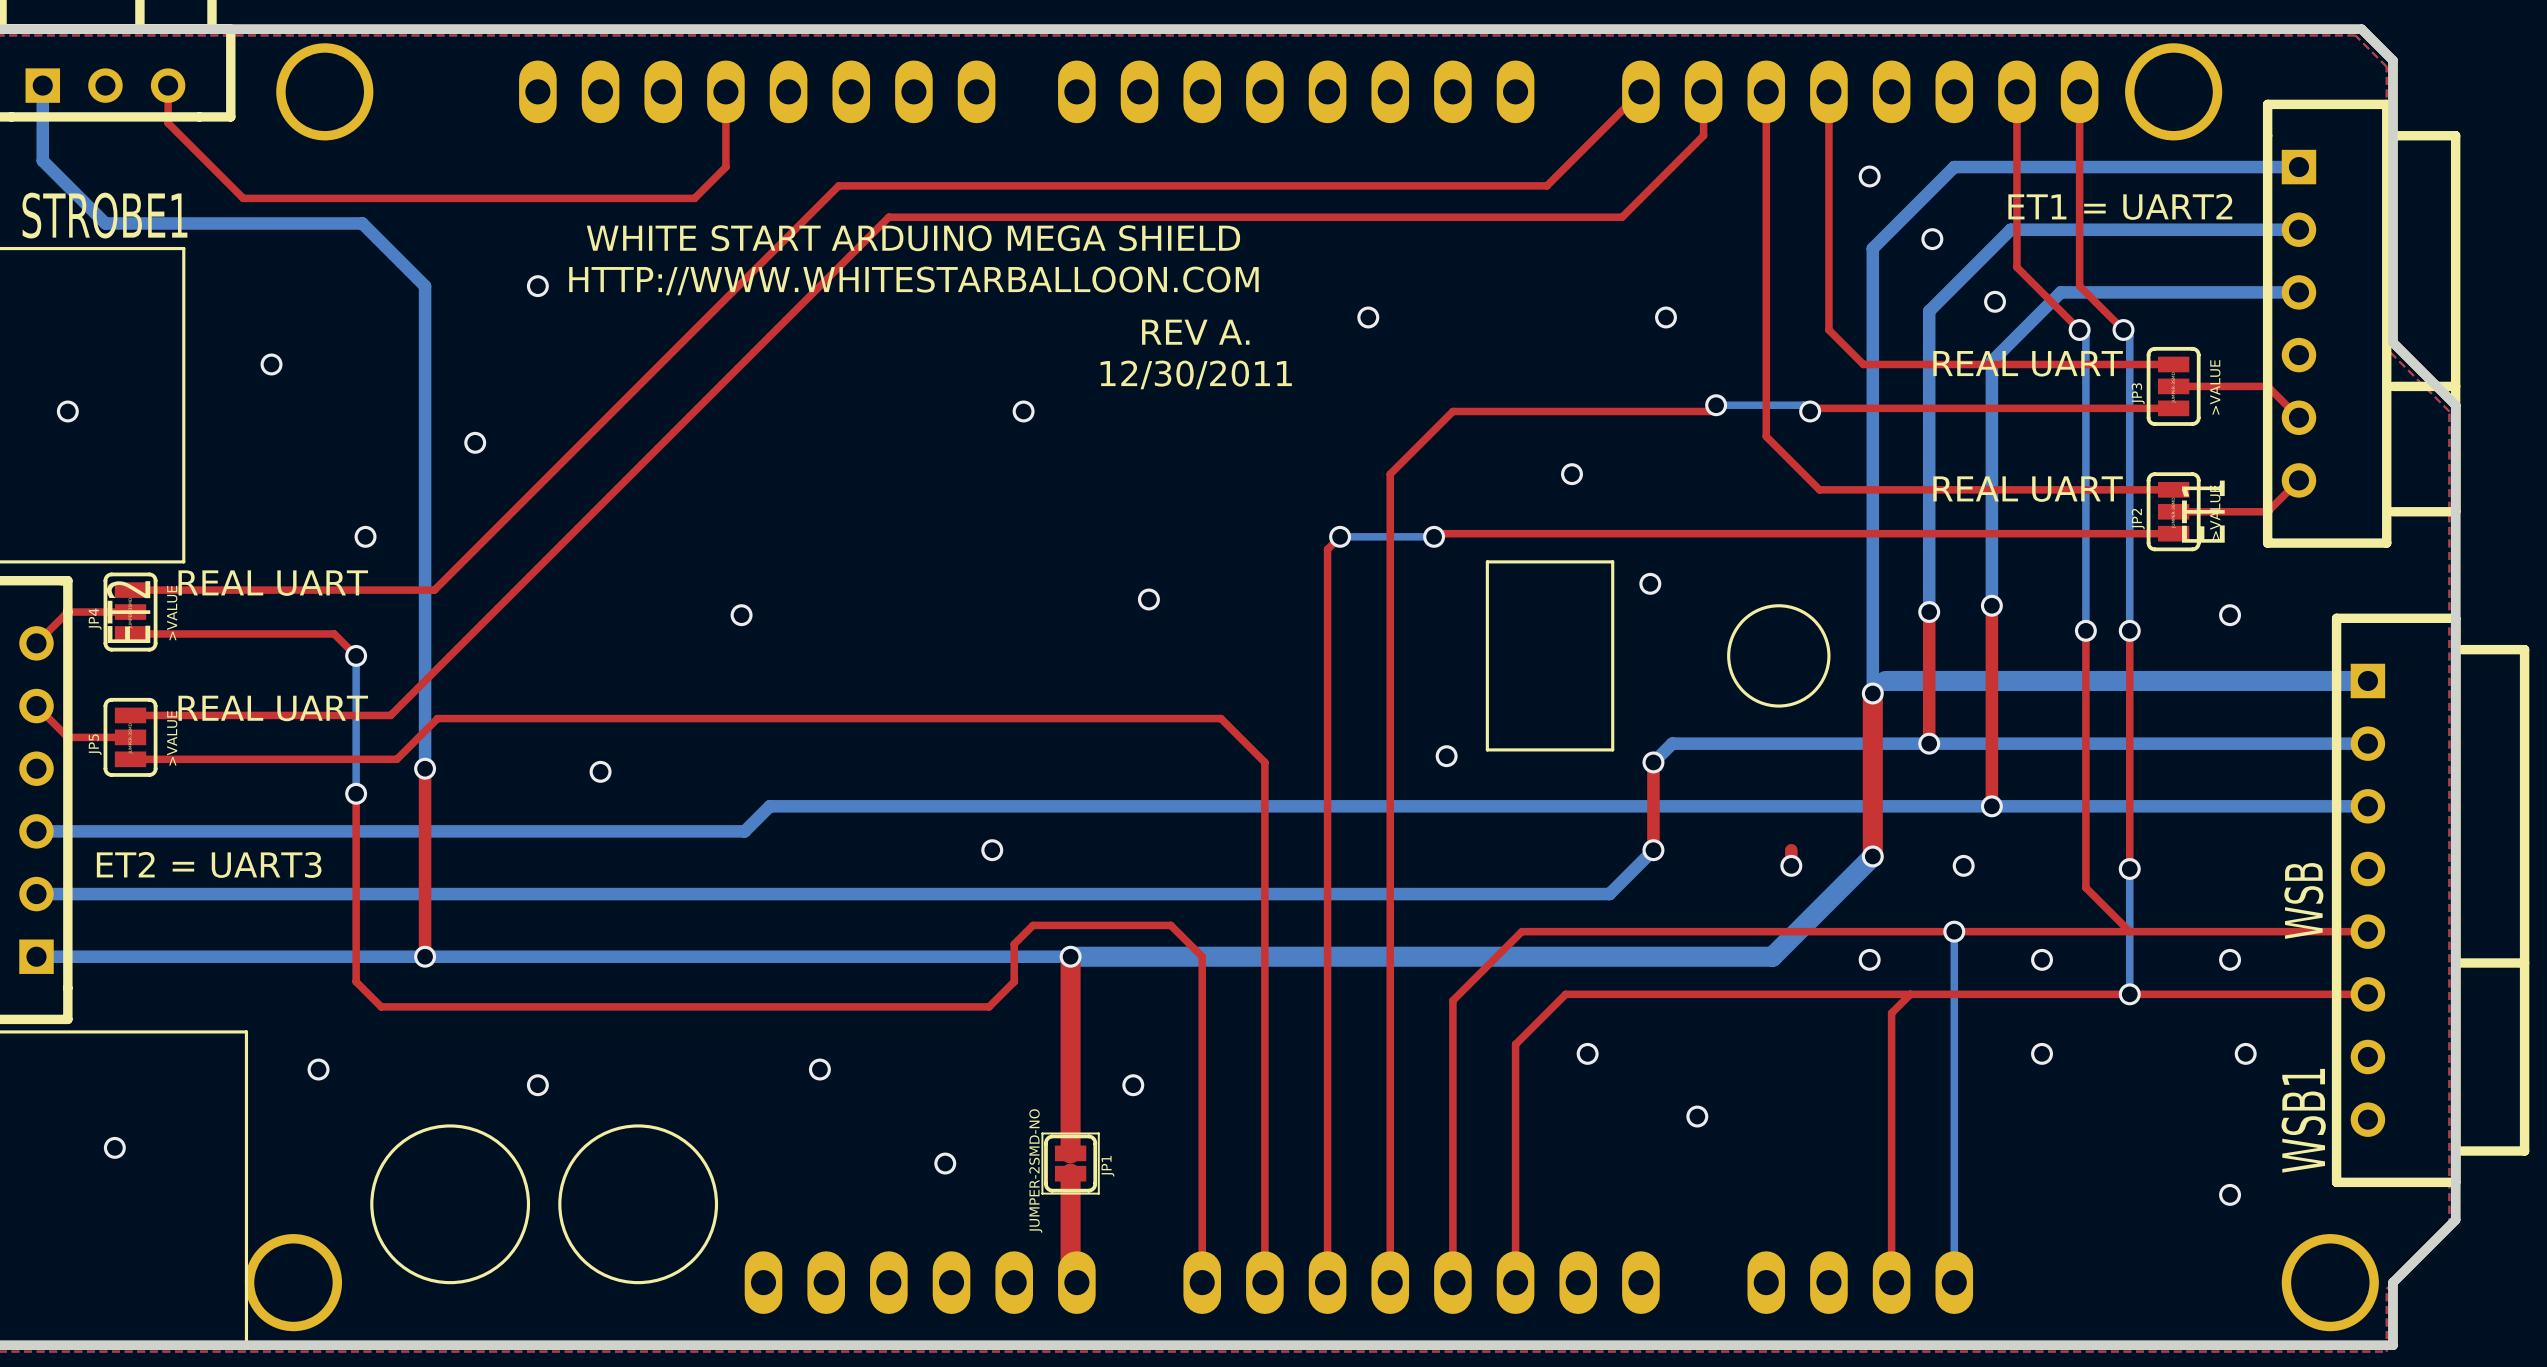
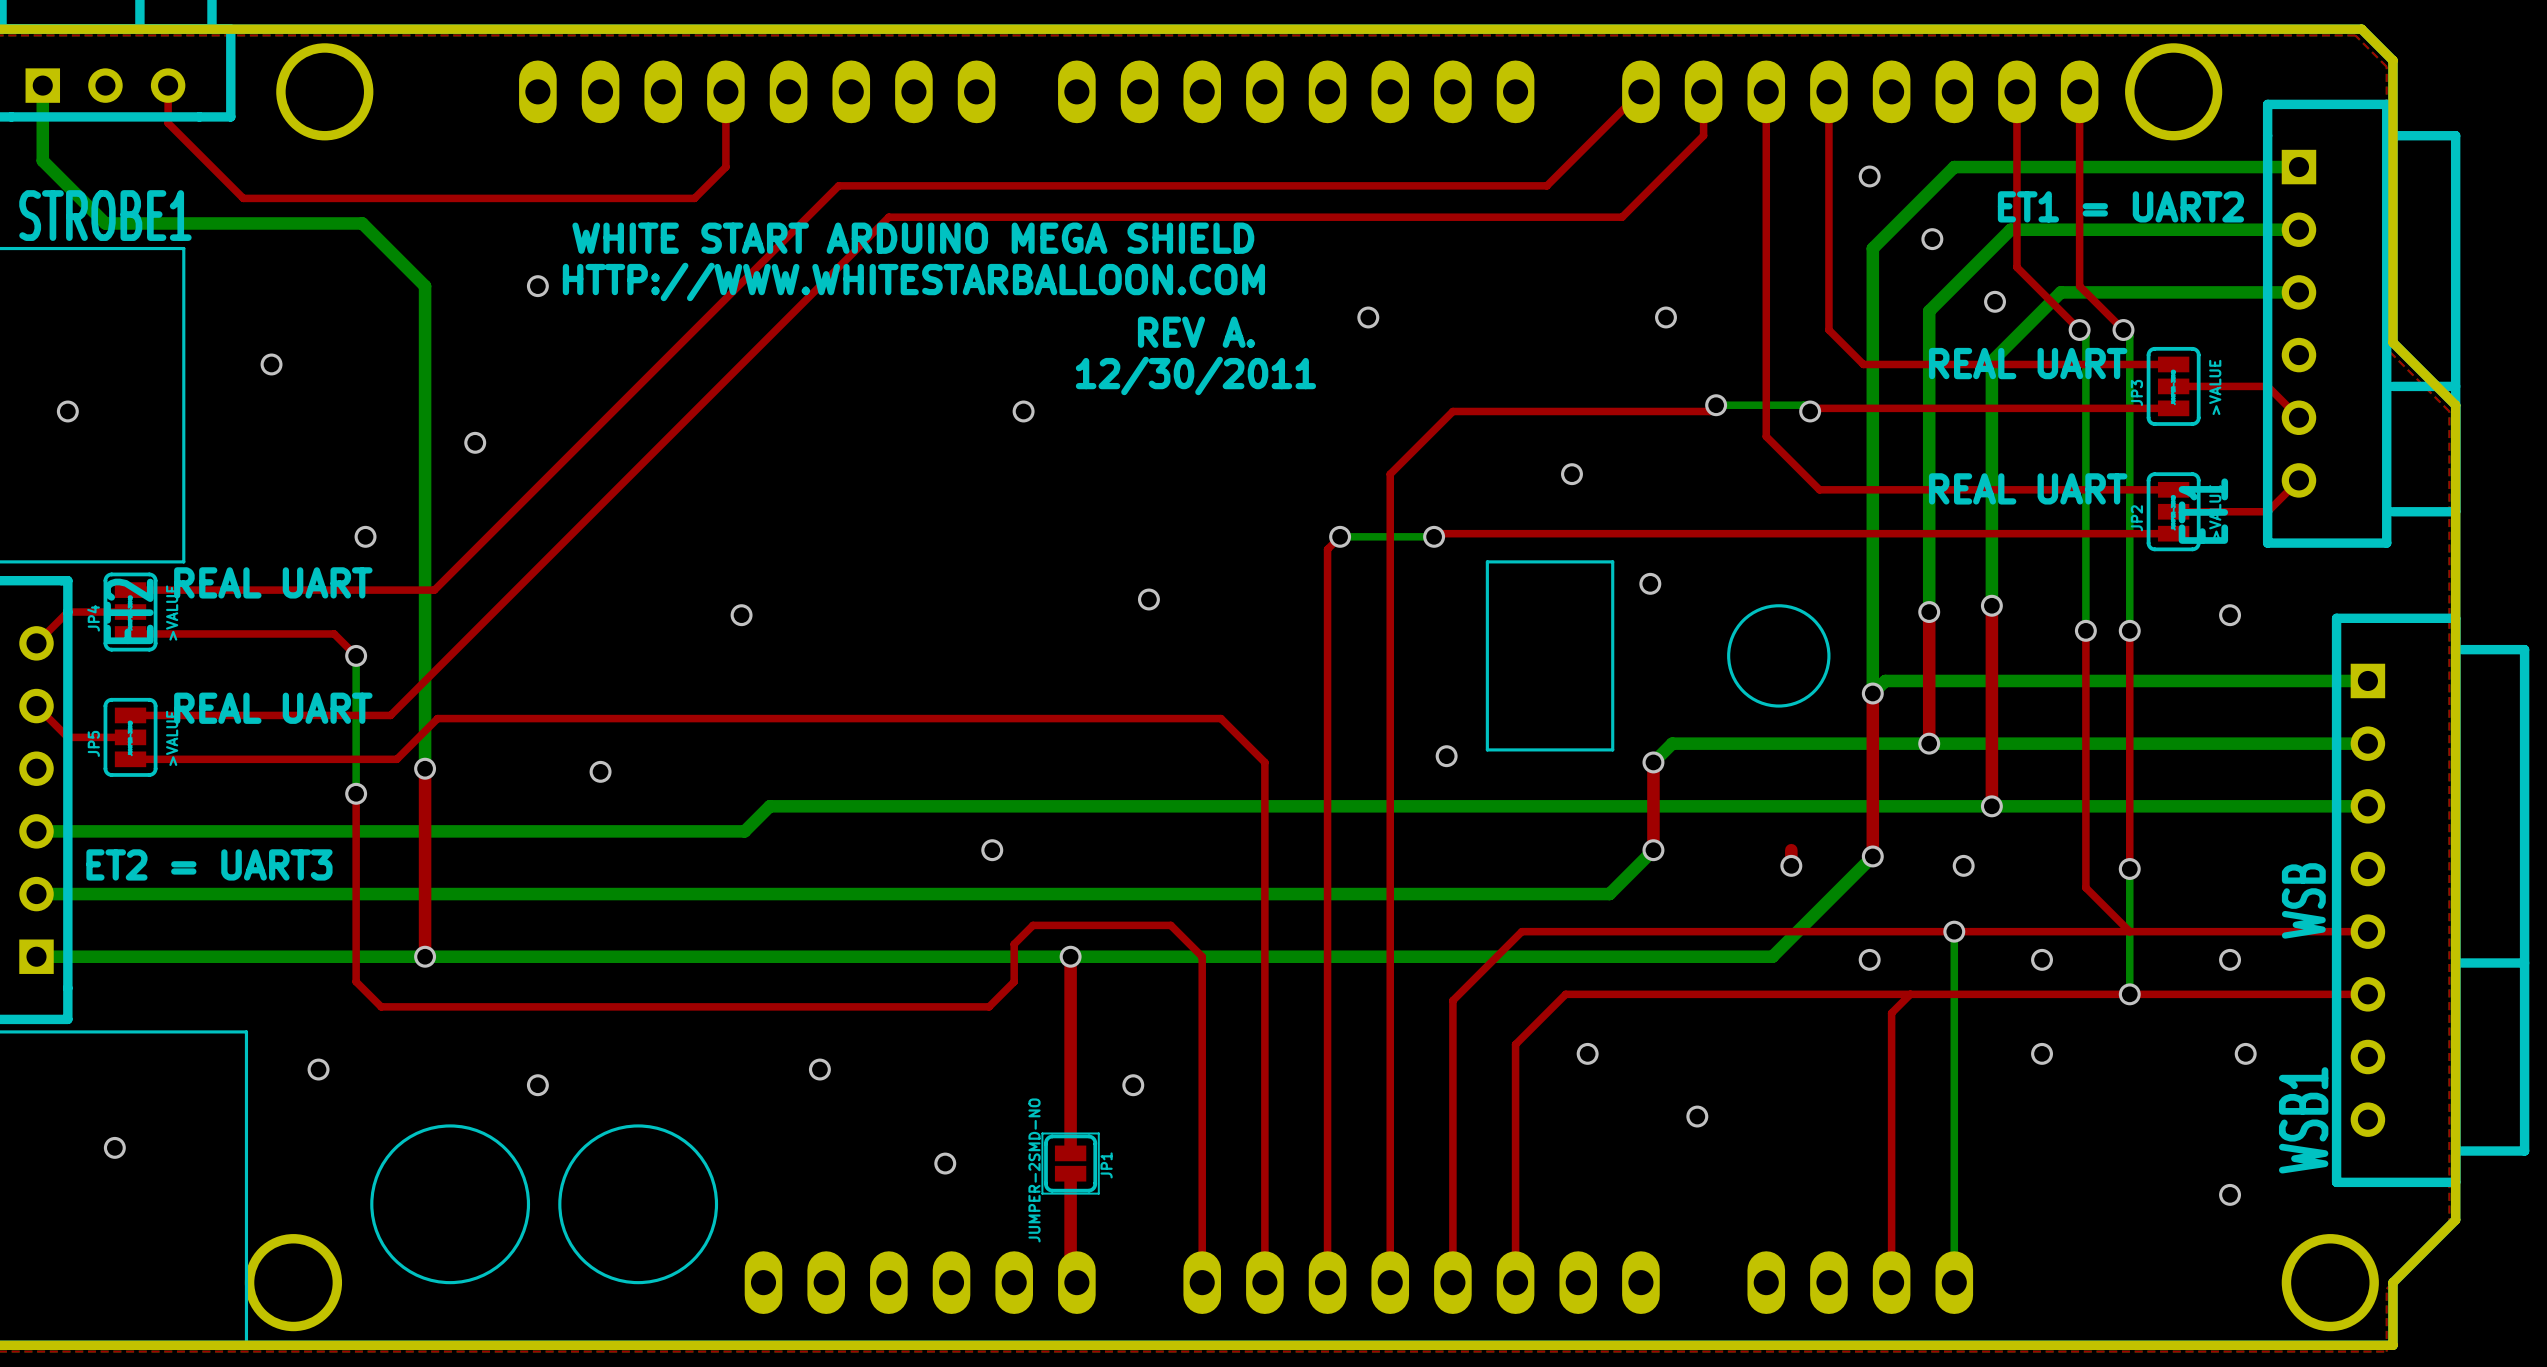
bottom track width: thick (1885, 680) (2367, 680) -> thin (1885, 680) (2367, 680)
top track width: thick (1872, 693) (1872, 856) -> thin (1872, 693) (1872, 856)
bottom track width: thick (1872, 856) (1772, 956) (1070, 956) -> thin (1872, 856) (1772, 956) (1070, 956)
top track width: thick (1070, 956) (1070, 1153) -> thin (1070, 956) (1070, 1153)
top track width: thick (1070, 1173) (1070, 1276) -> thin (1070, 1173) (1070, 1276)

